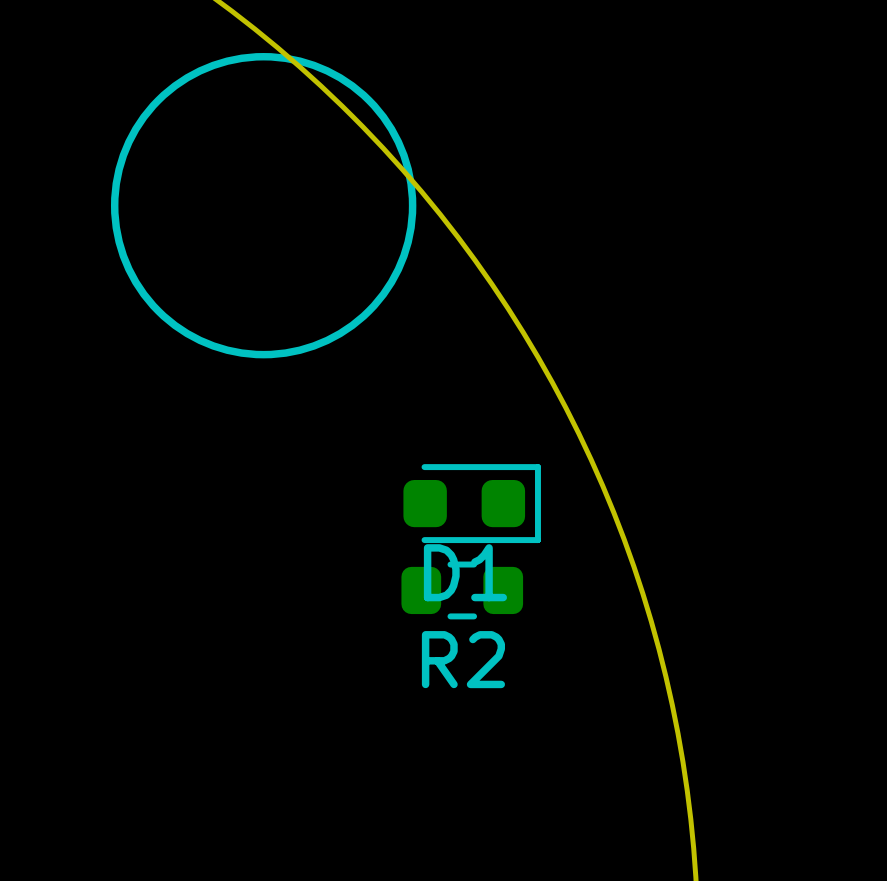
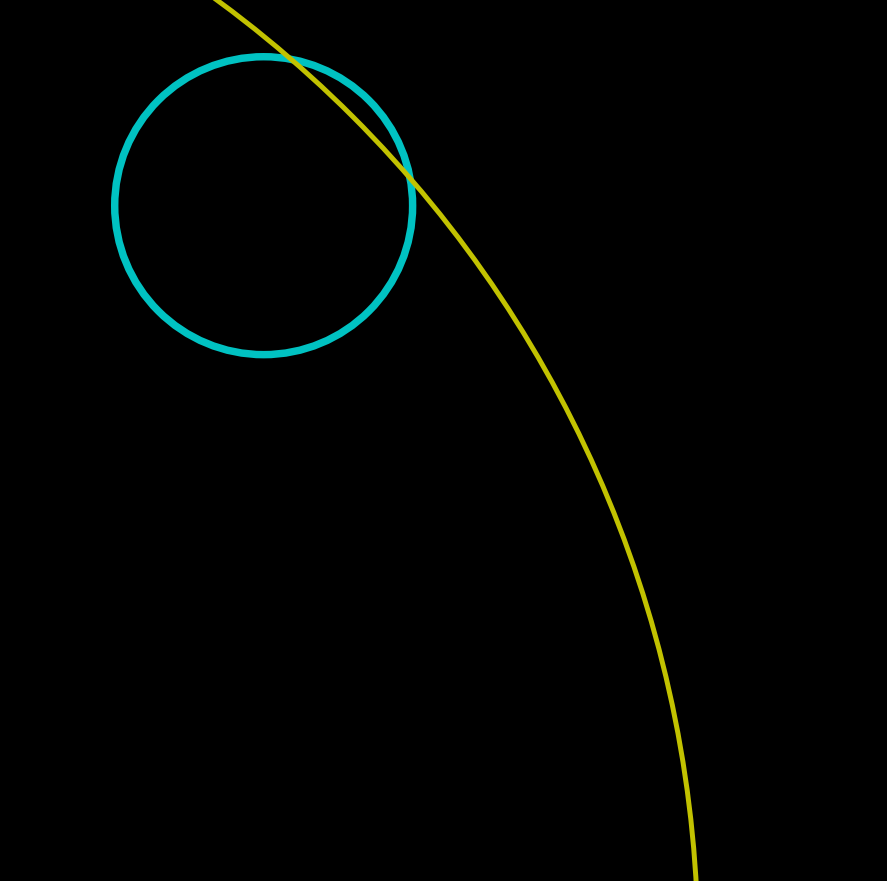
D1: (472, 503) -> none
R2: (462, 590) -> none

